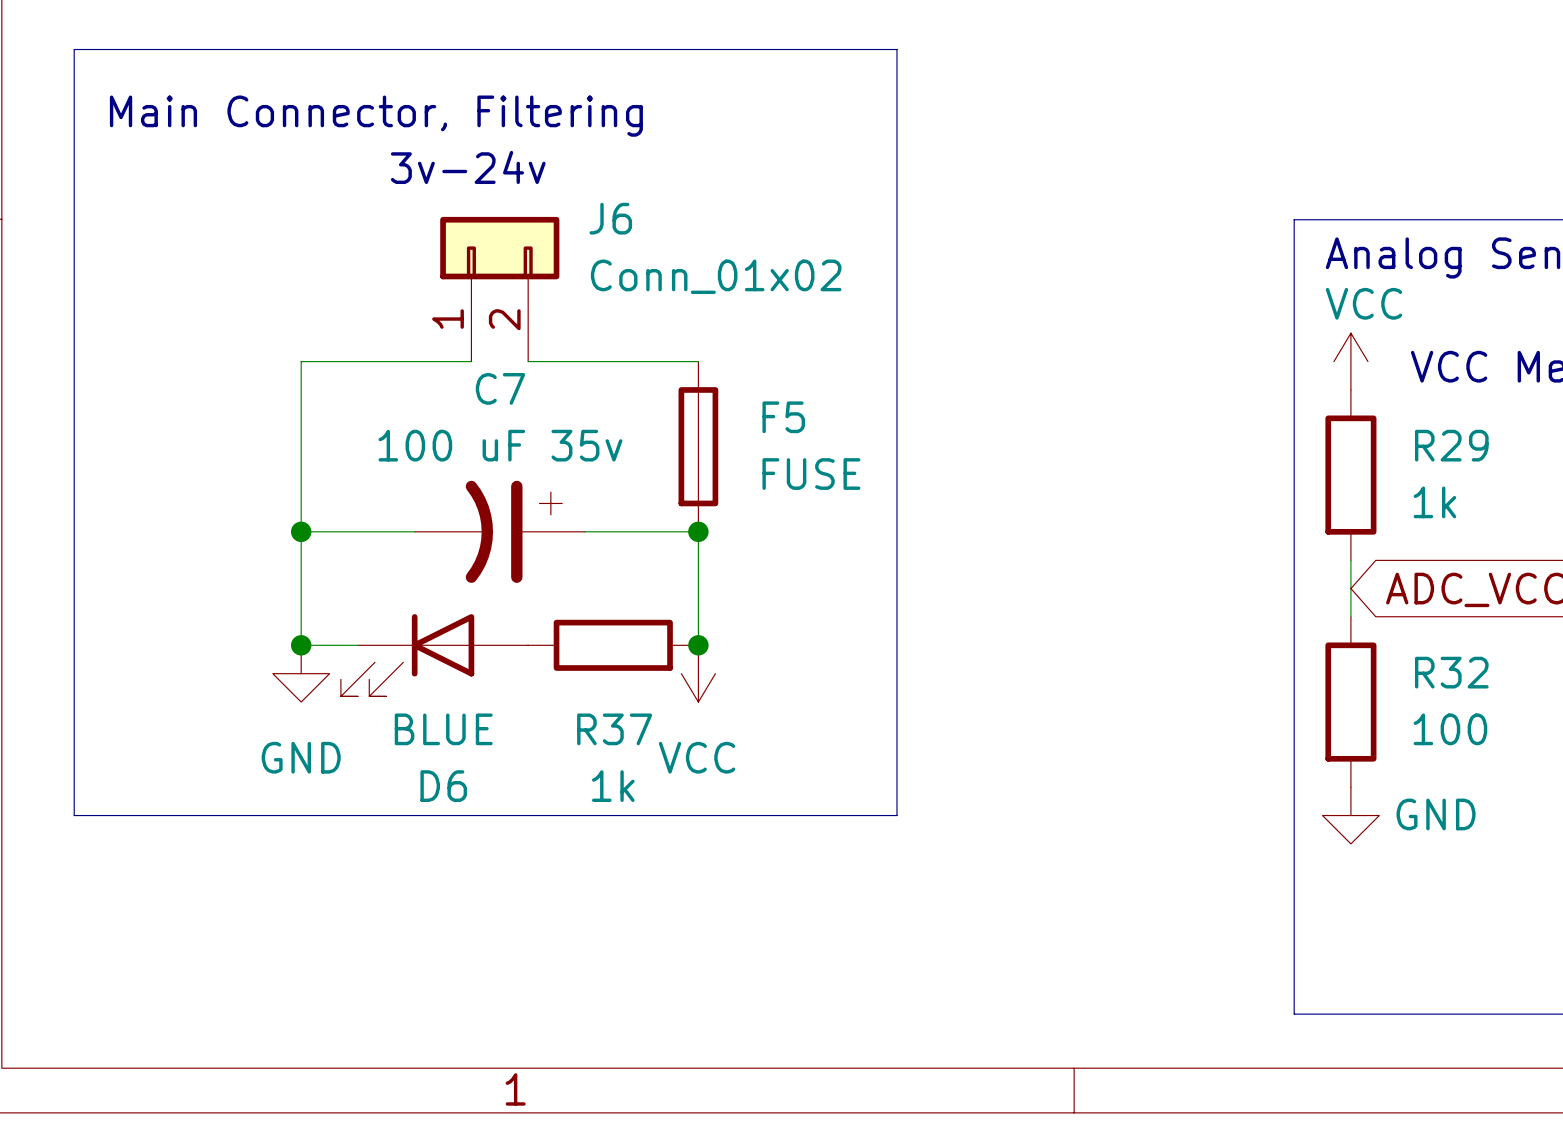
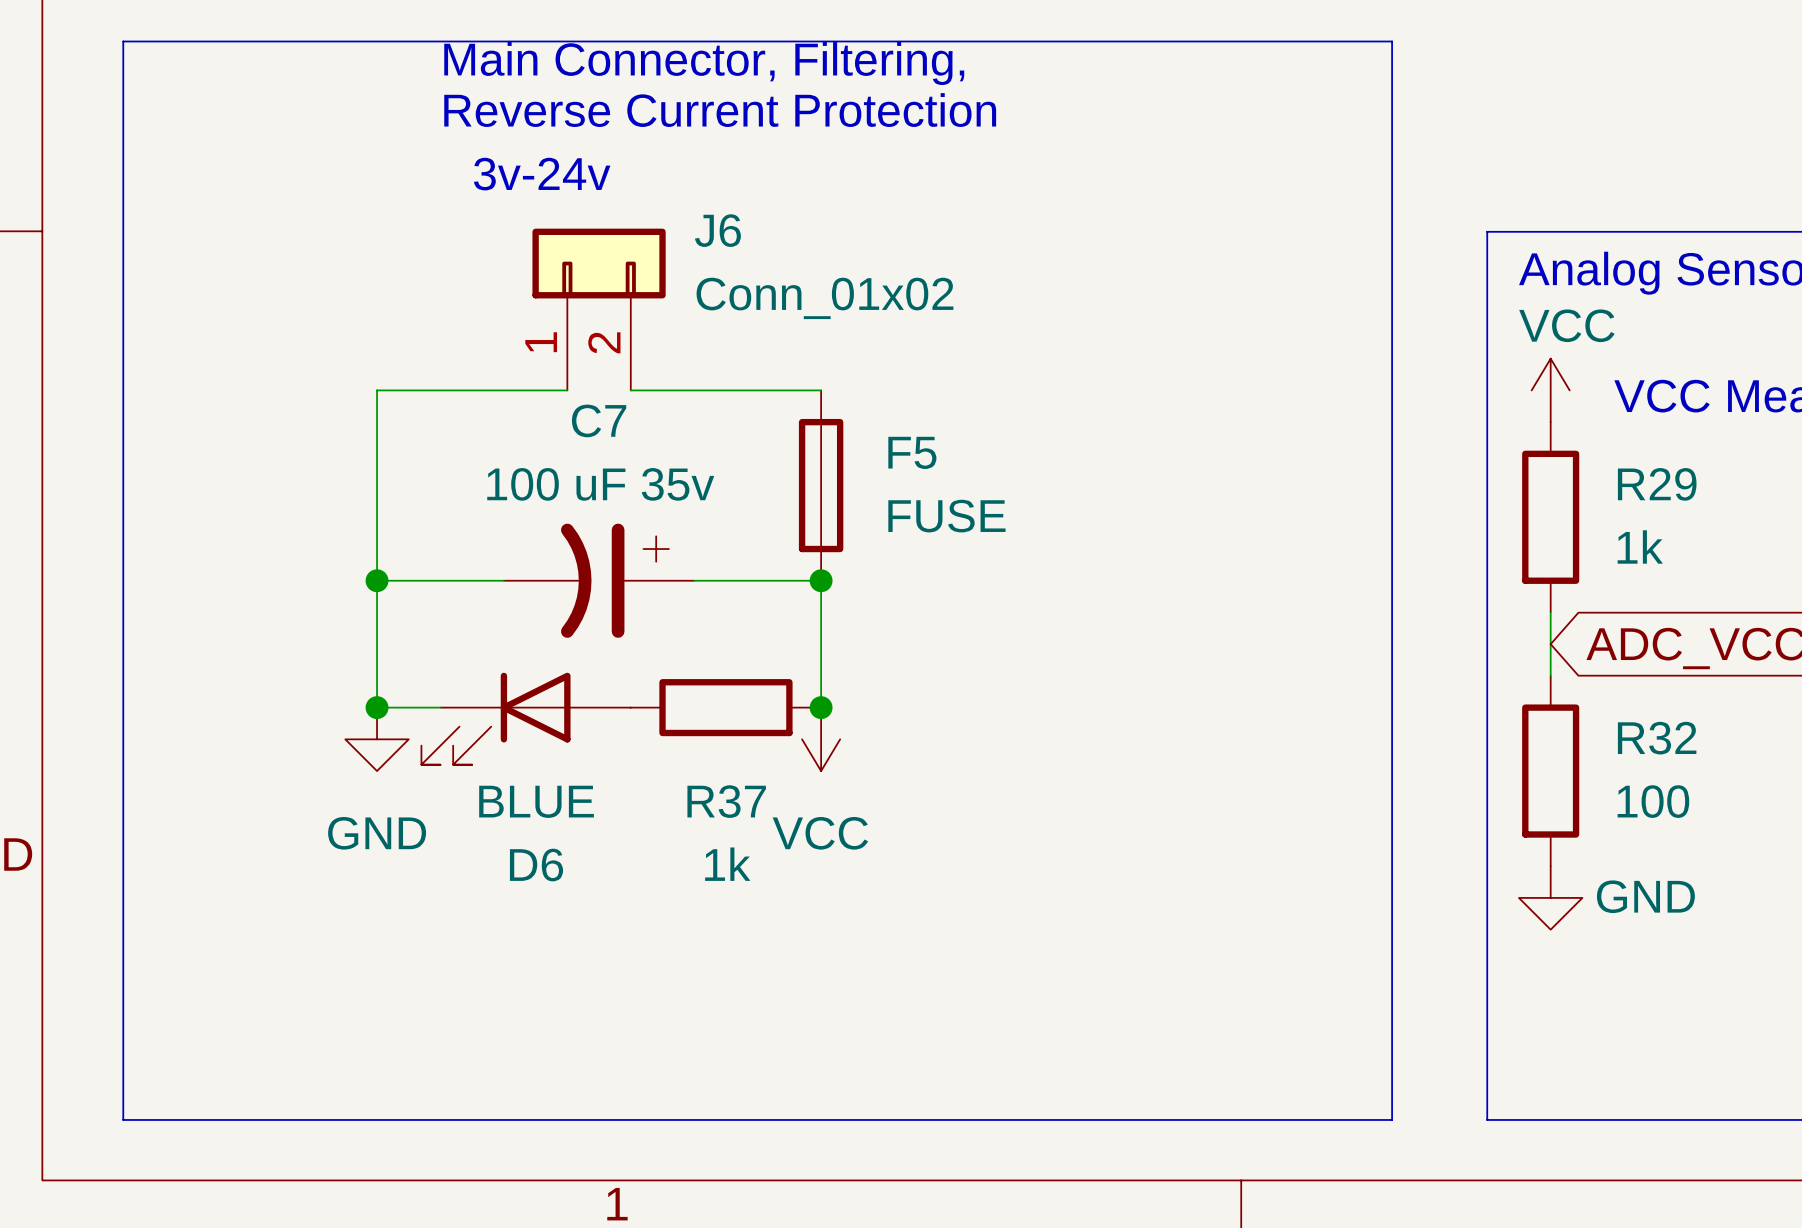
line: (896, 49) (896, 815) (74, 815) -> (1043, 41) (1392, 41) (1392, 1119) (123, 1119) (123, 897)
text: none -> Reverse Current Protection (720, 110)
text: Main Connector, Filtering (376, 116) -> Main Connector, Filtering, (704, 63)

